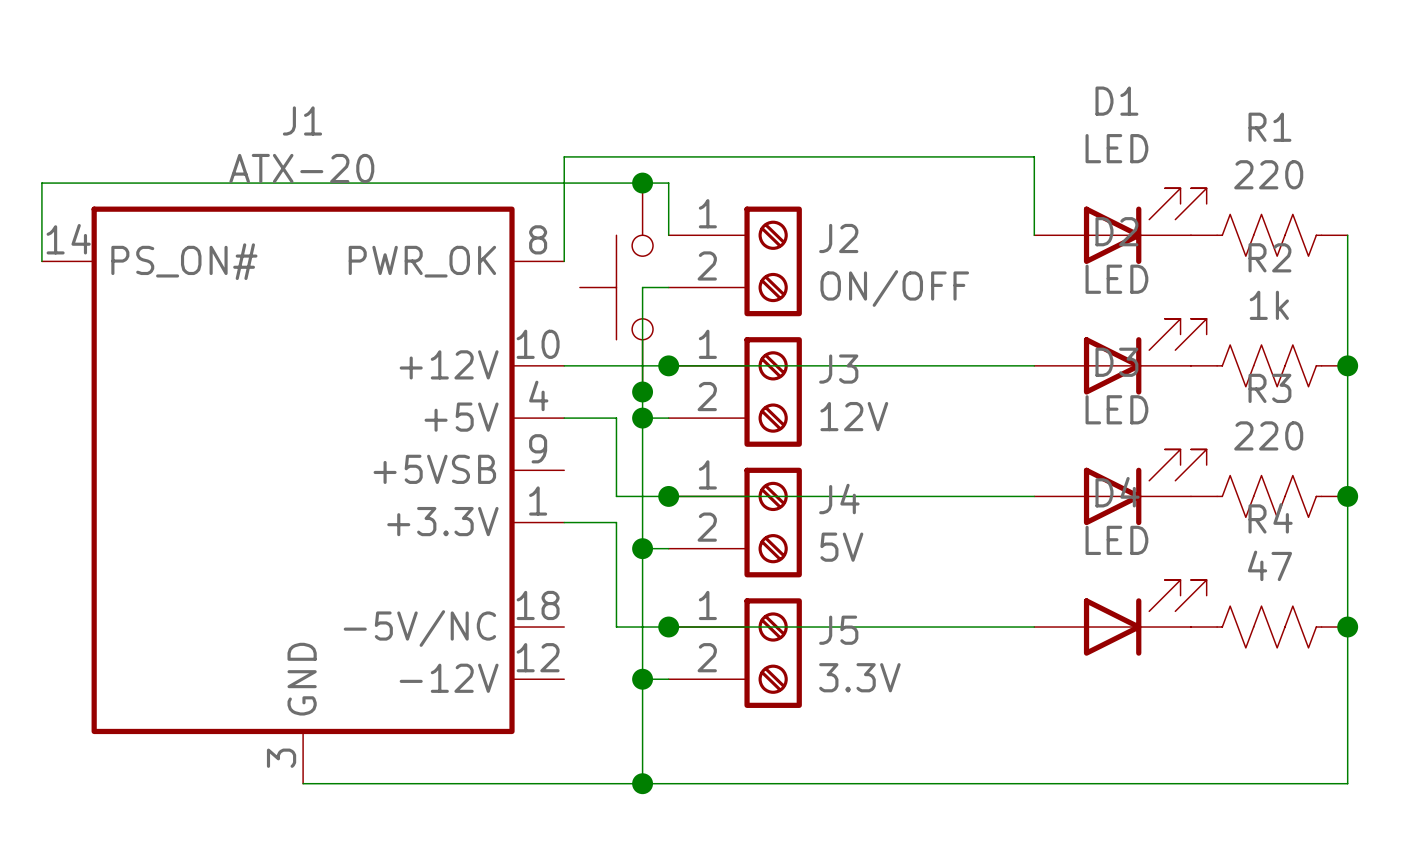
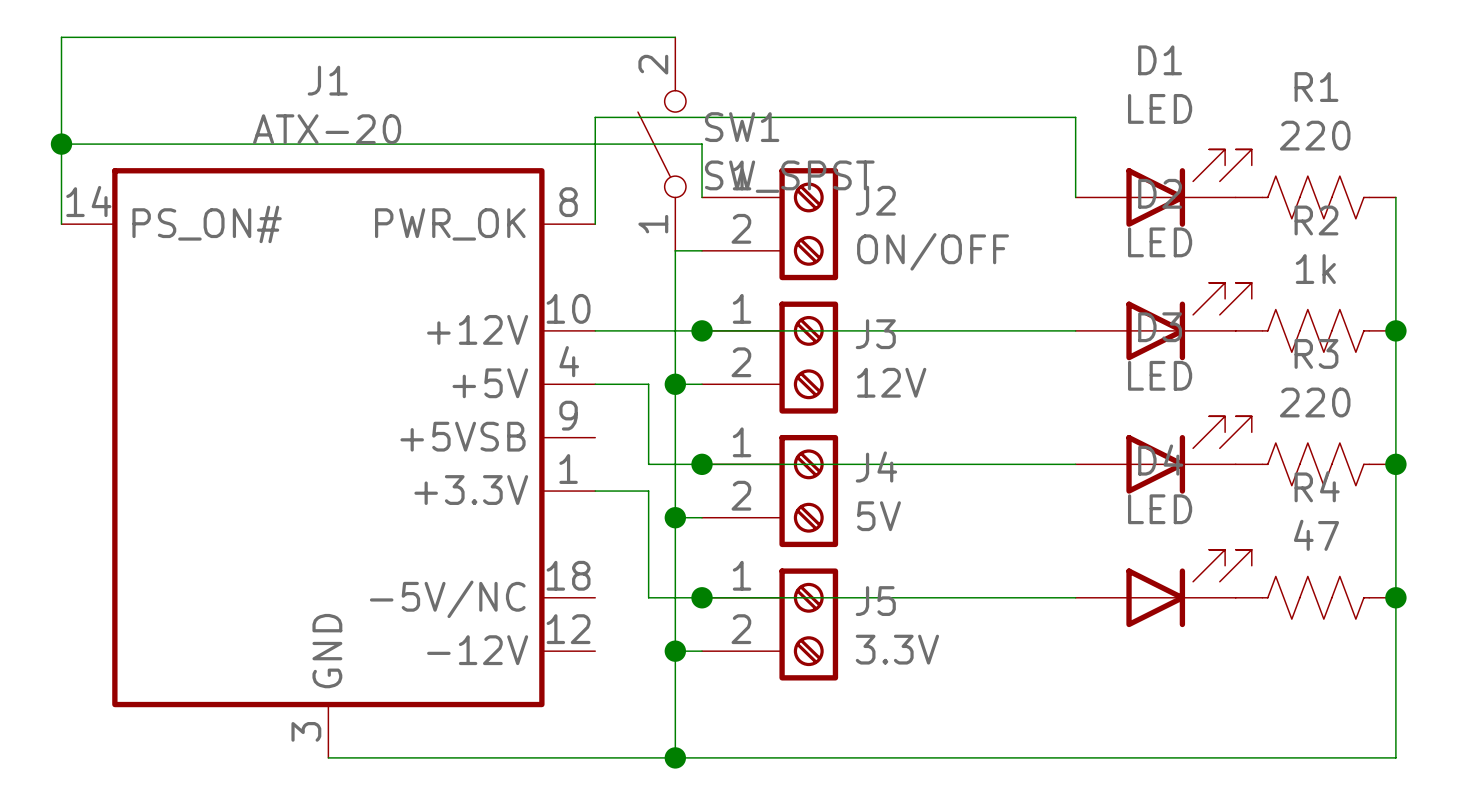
wire: none -> (675, 37) (61, 37) (61, 144)
junction: none -> (61, 144)
SW1: none -> SW_SPST (661, 144)
junction: (642, 183) -> none
part: (616, 287) -> none
junction: (642, 391) -> none

